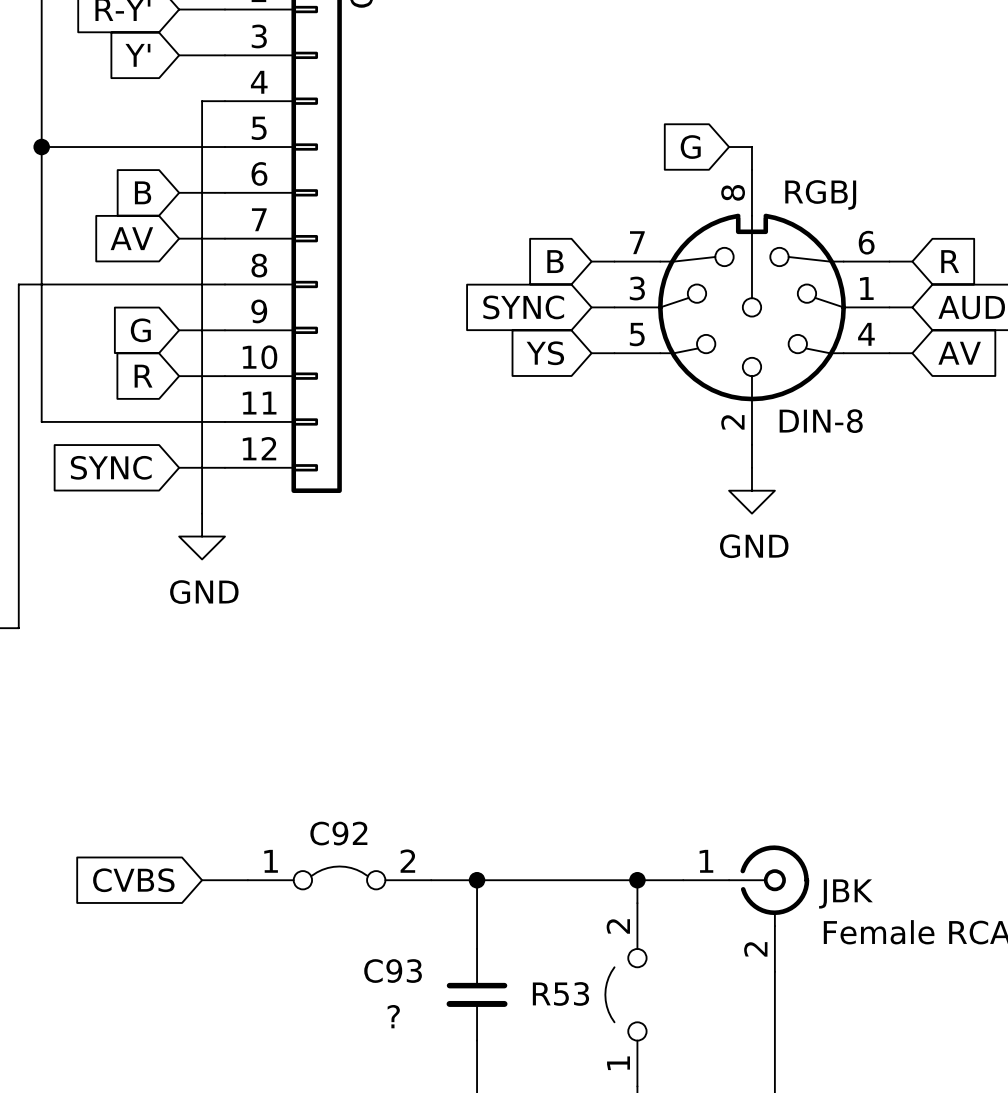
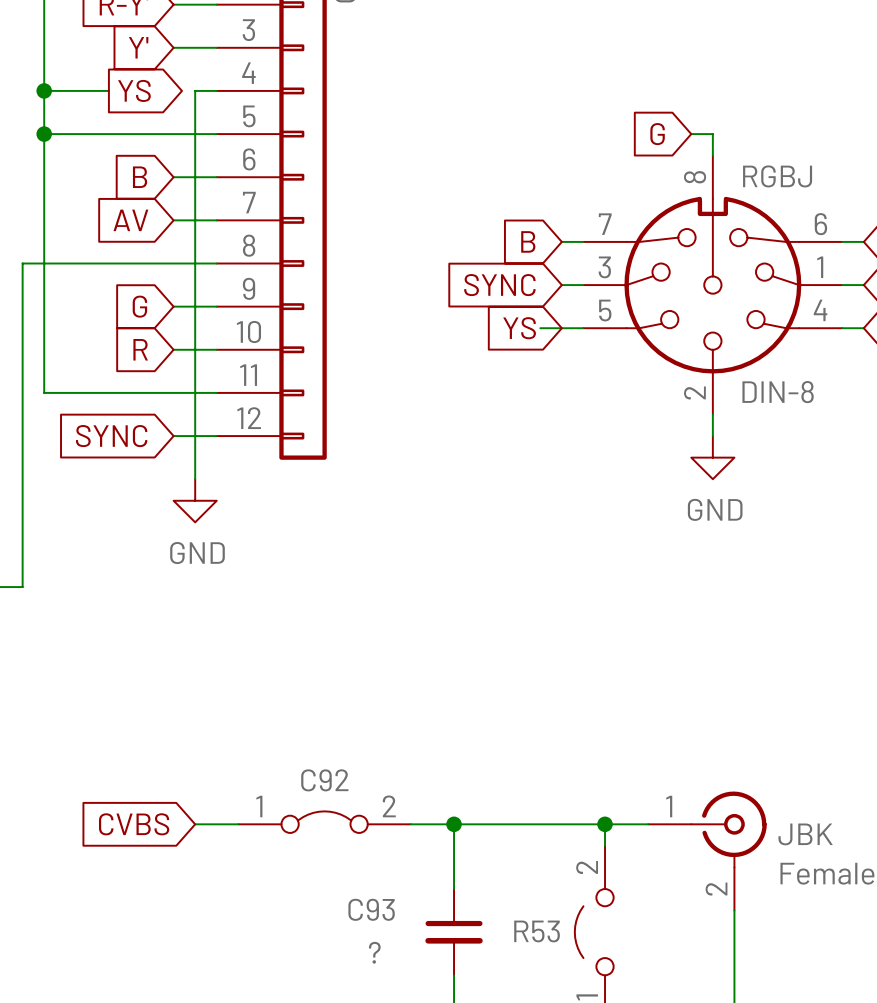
wire: none -> (44, 90) (108, 90)
junction: none -> (44, 90)
global label: none -> YS (134, 90)
wire: none -> (540, 328) (561, 328)

